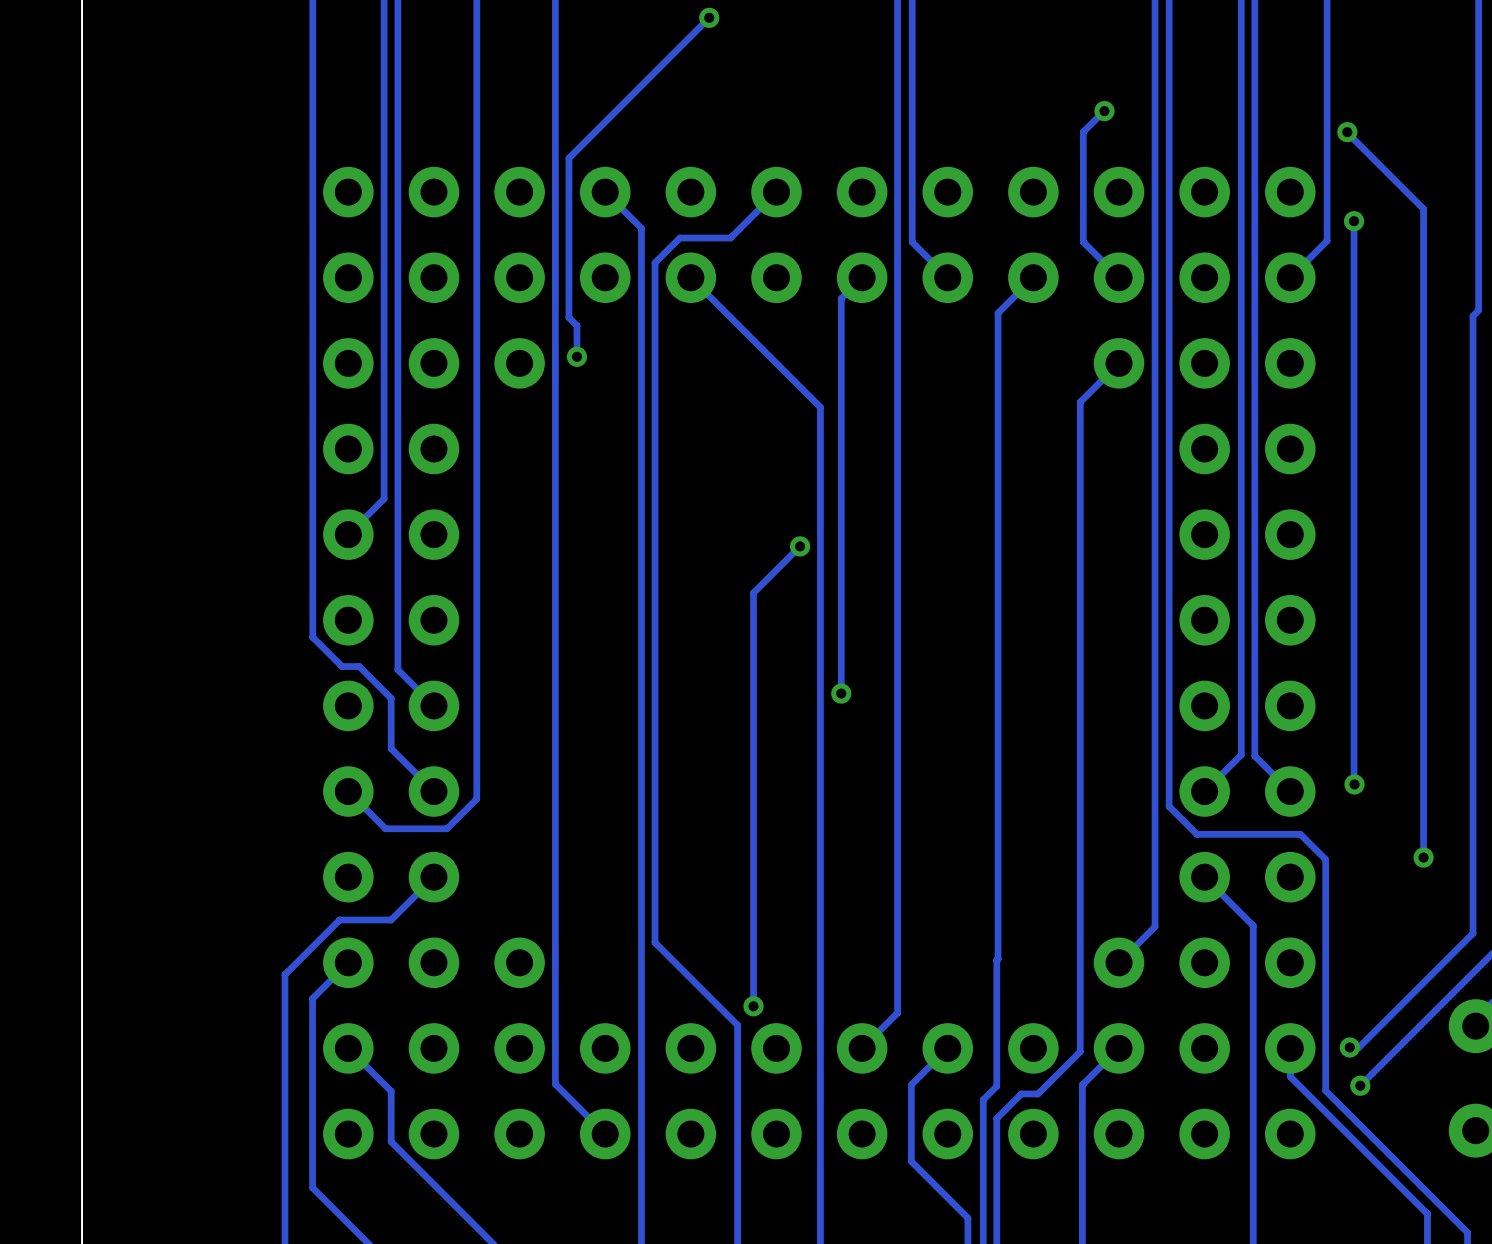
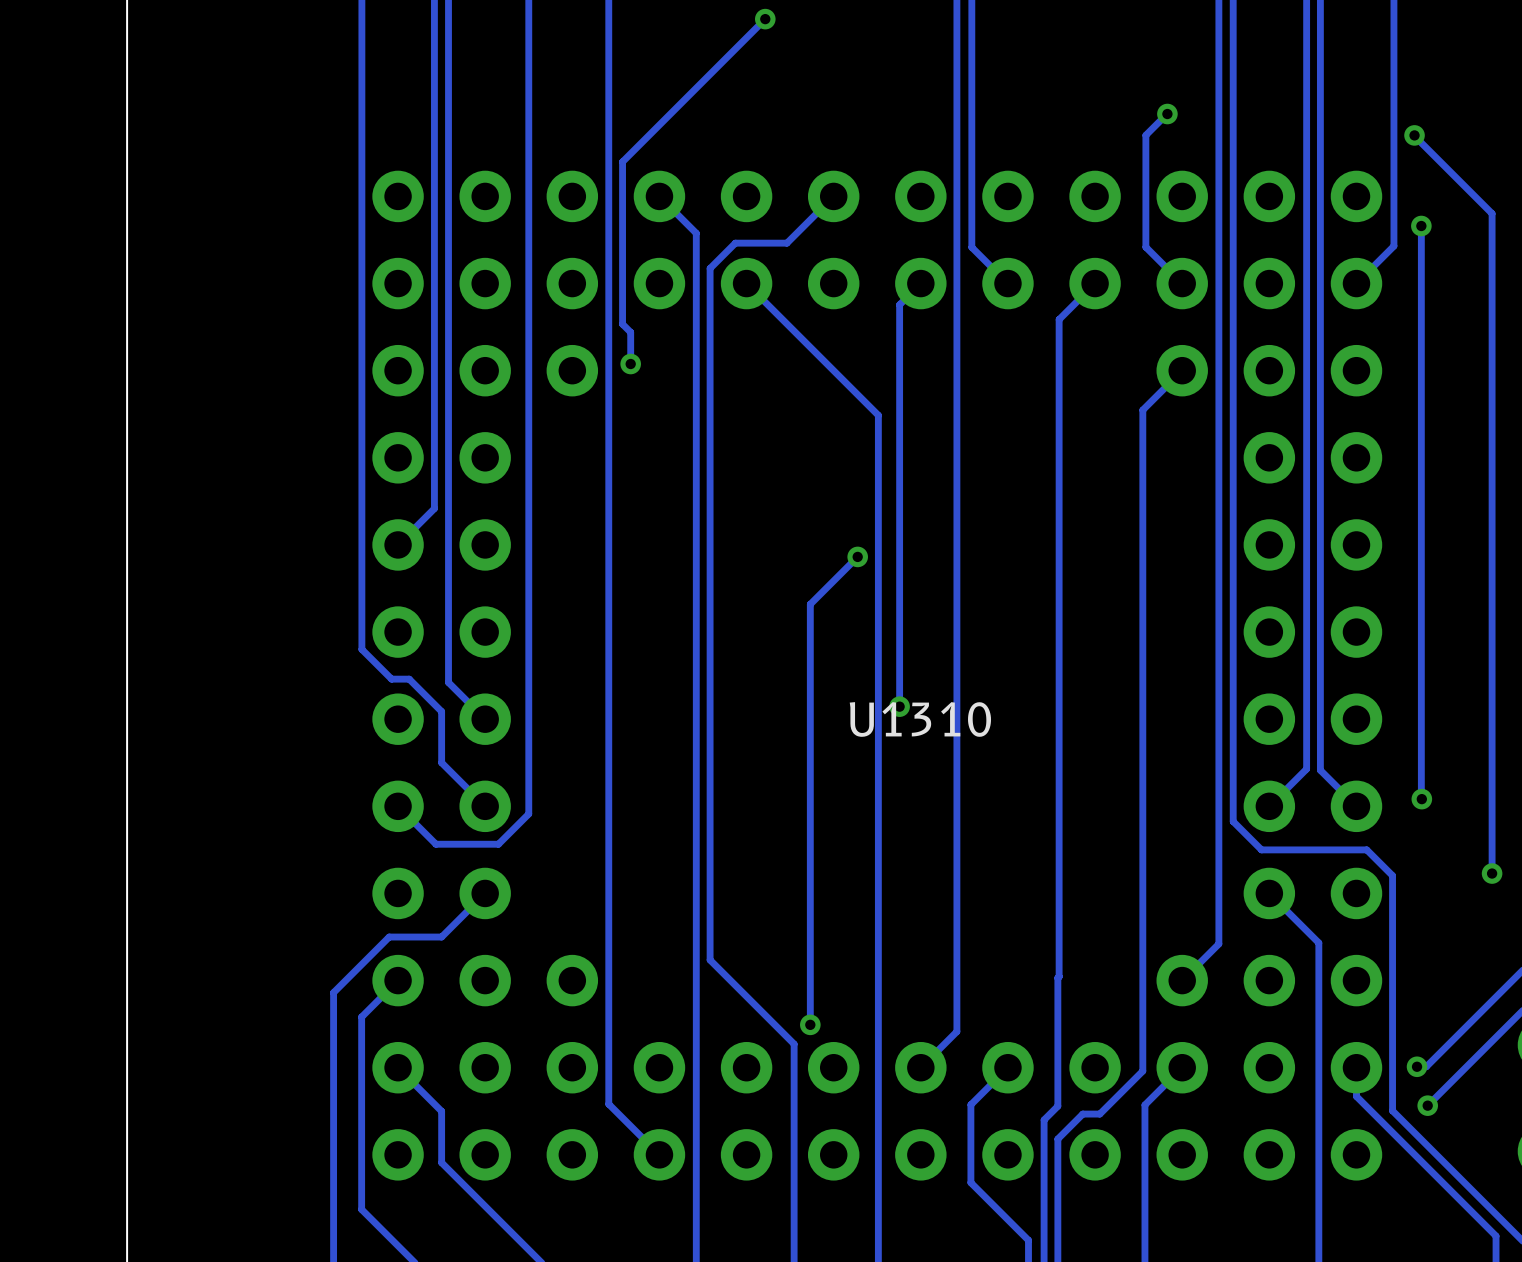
U1310 name: none -> U1310 (920, 719)

